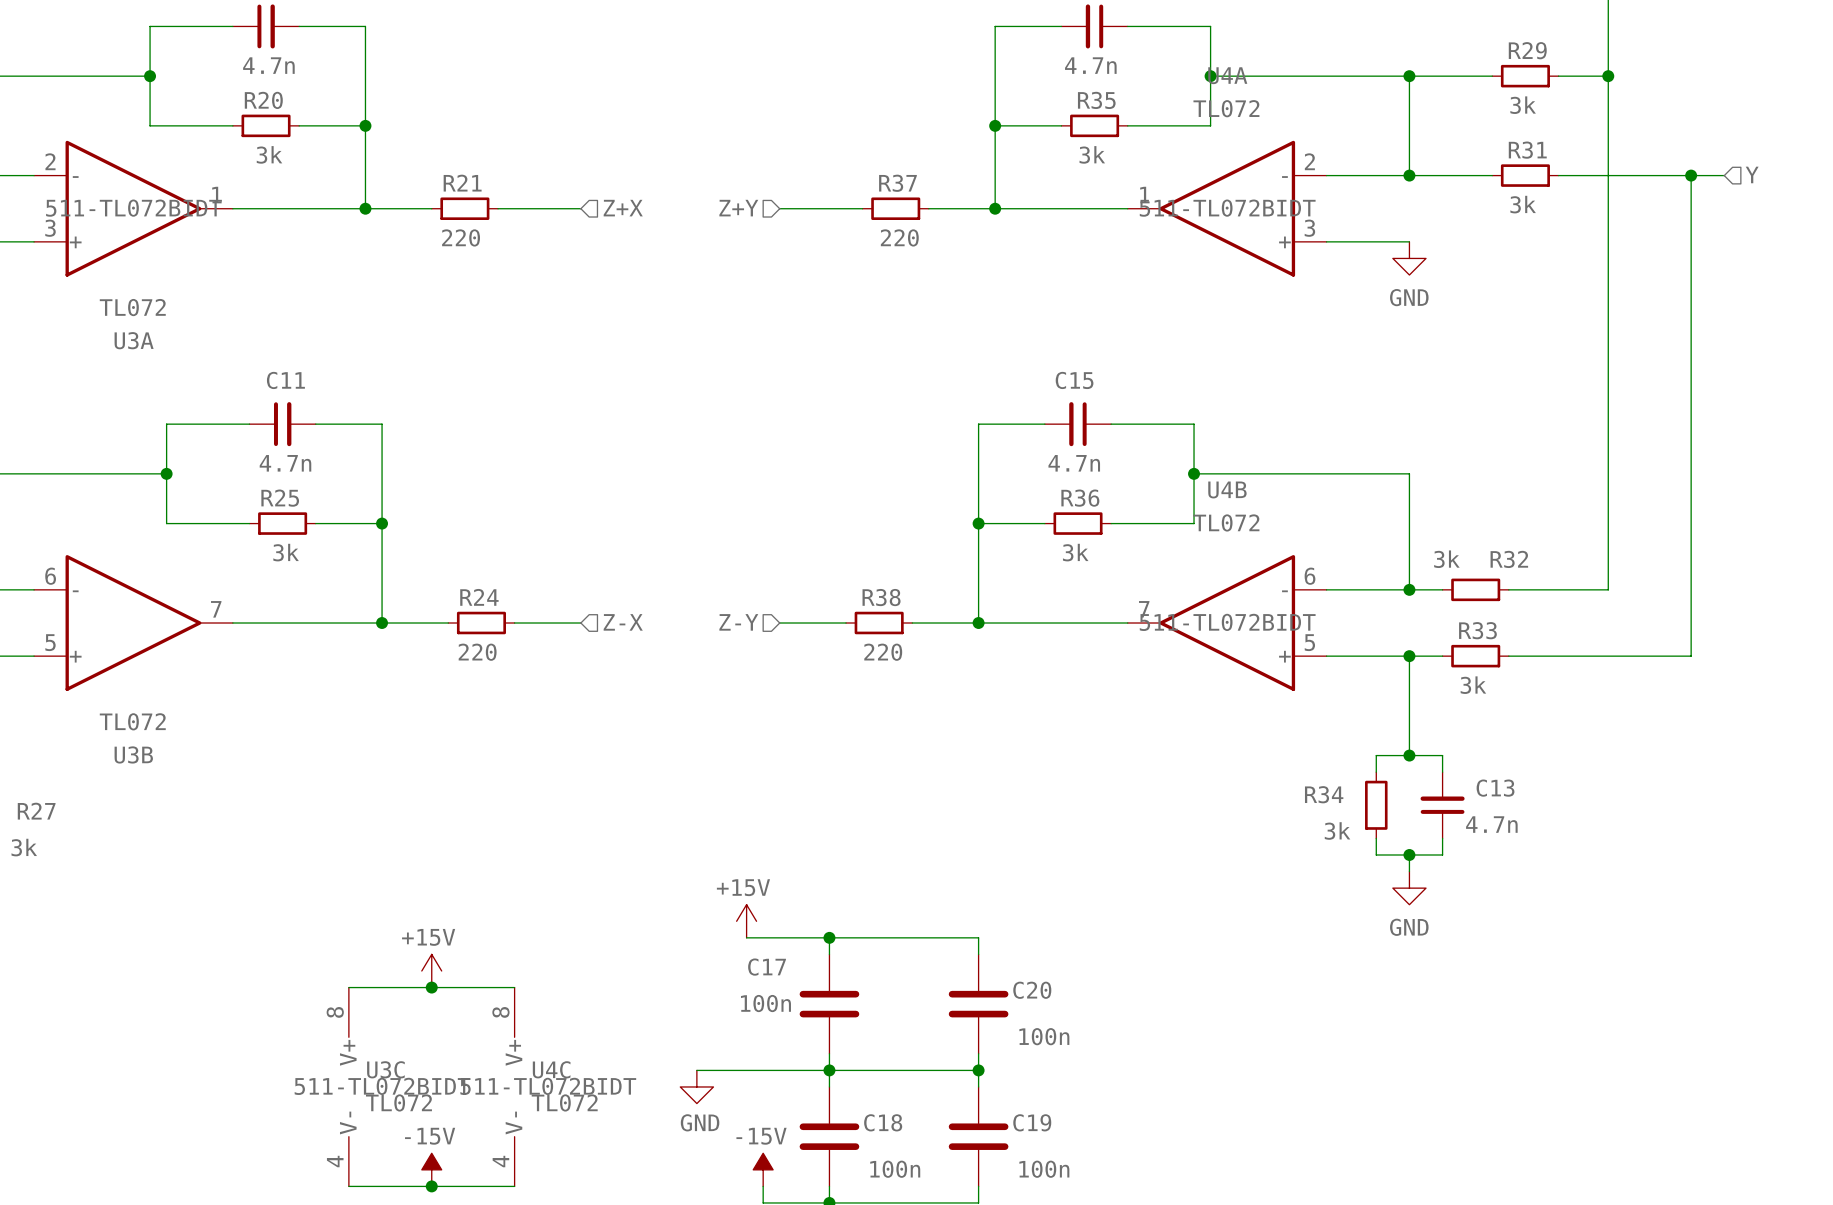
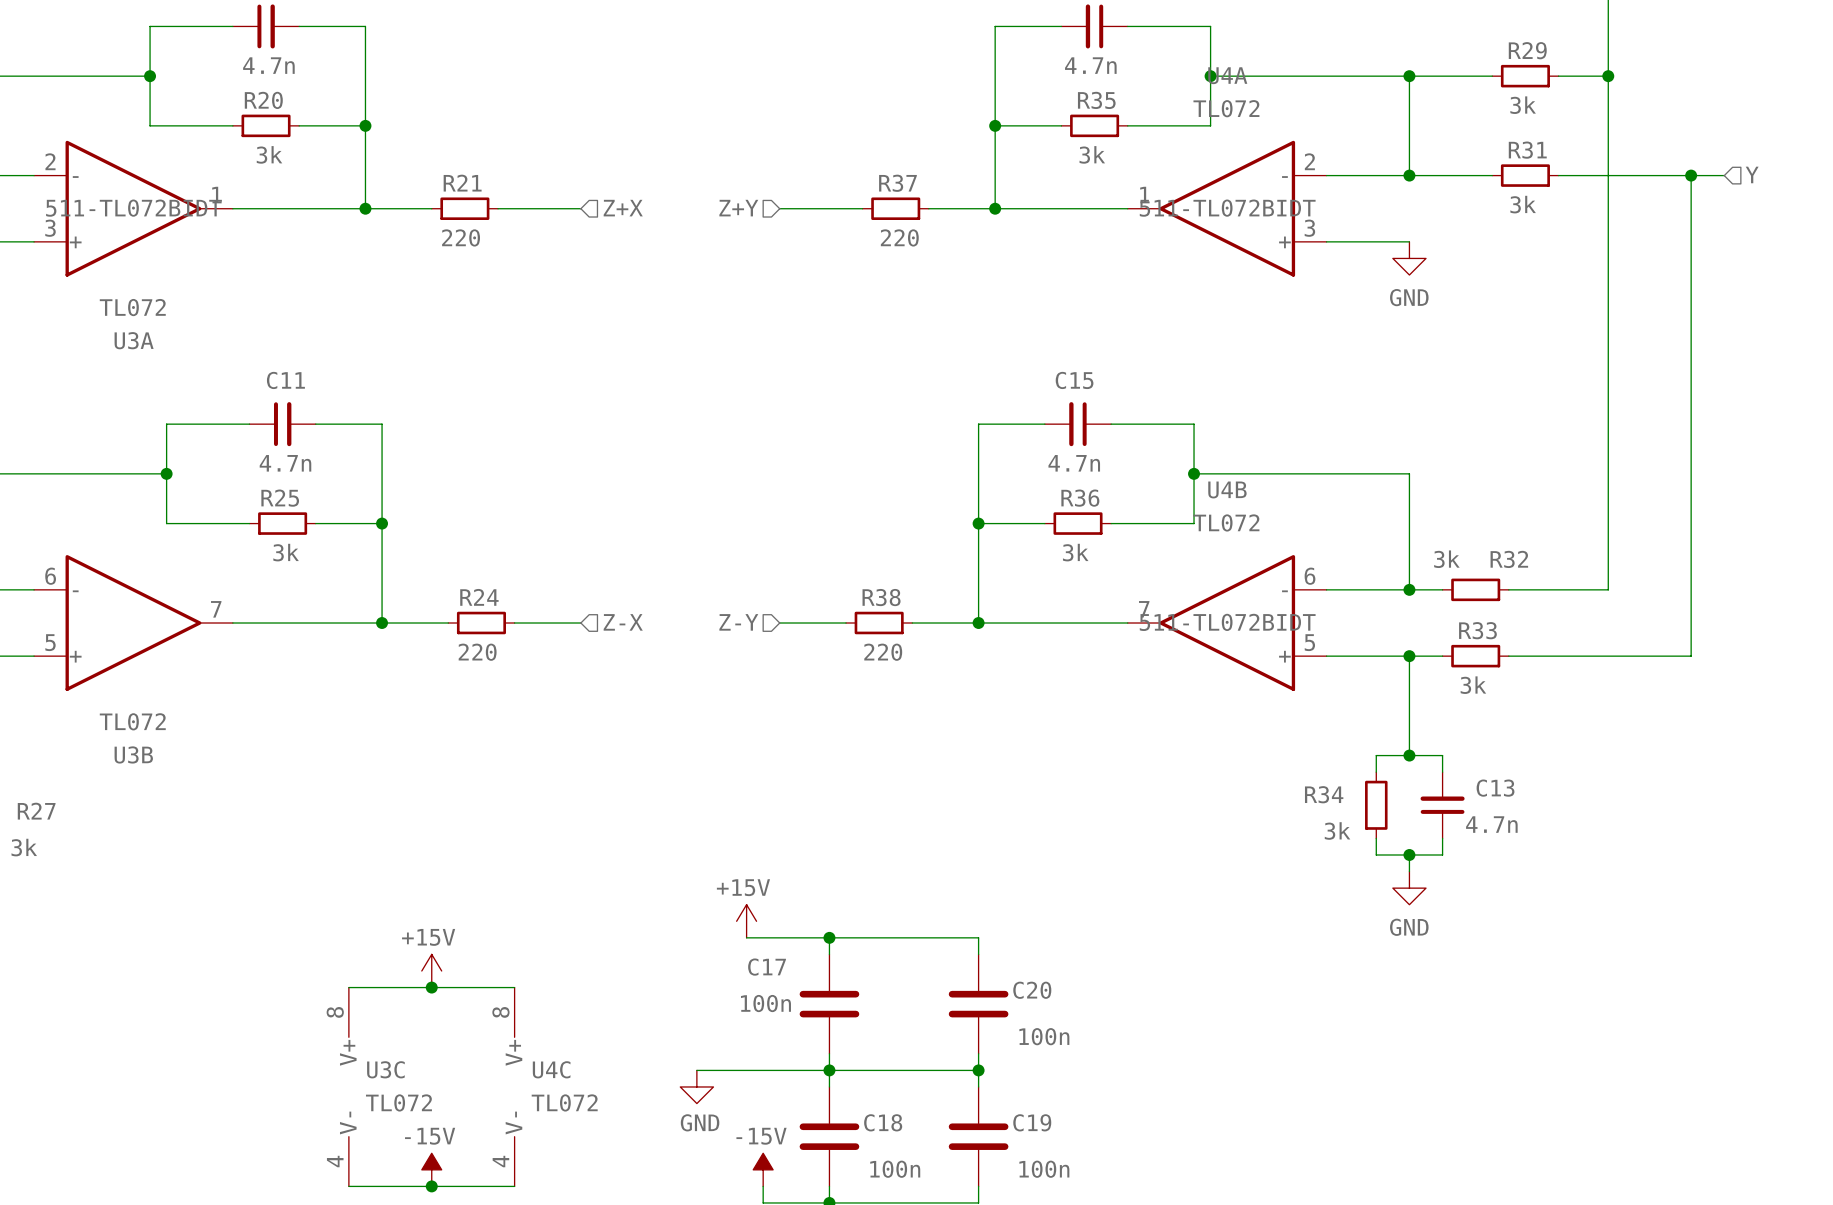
U3C text: 511-TL072BIDT (382, 1086) -> none
U4C text: 511-TL072BIDT (548, 1086) -> none

